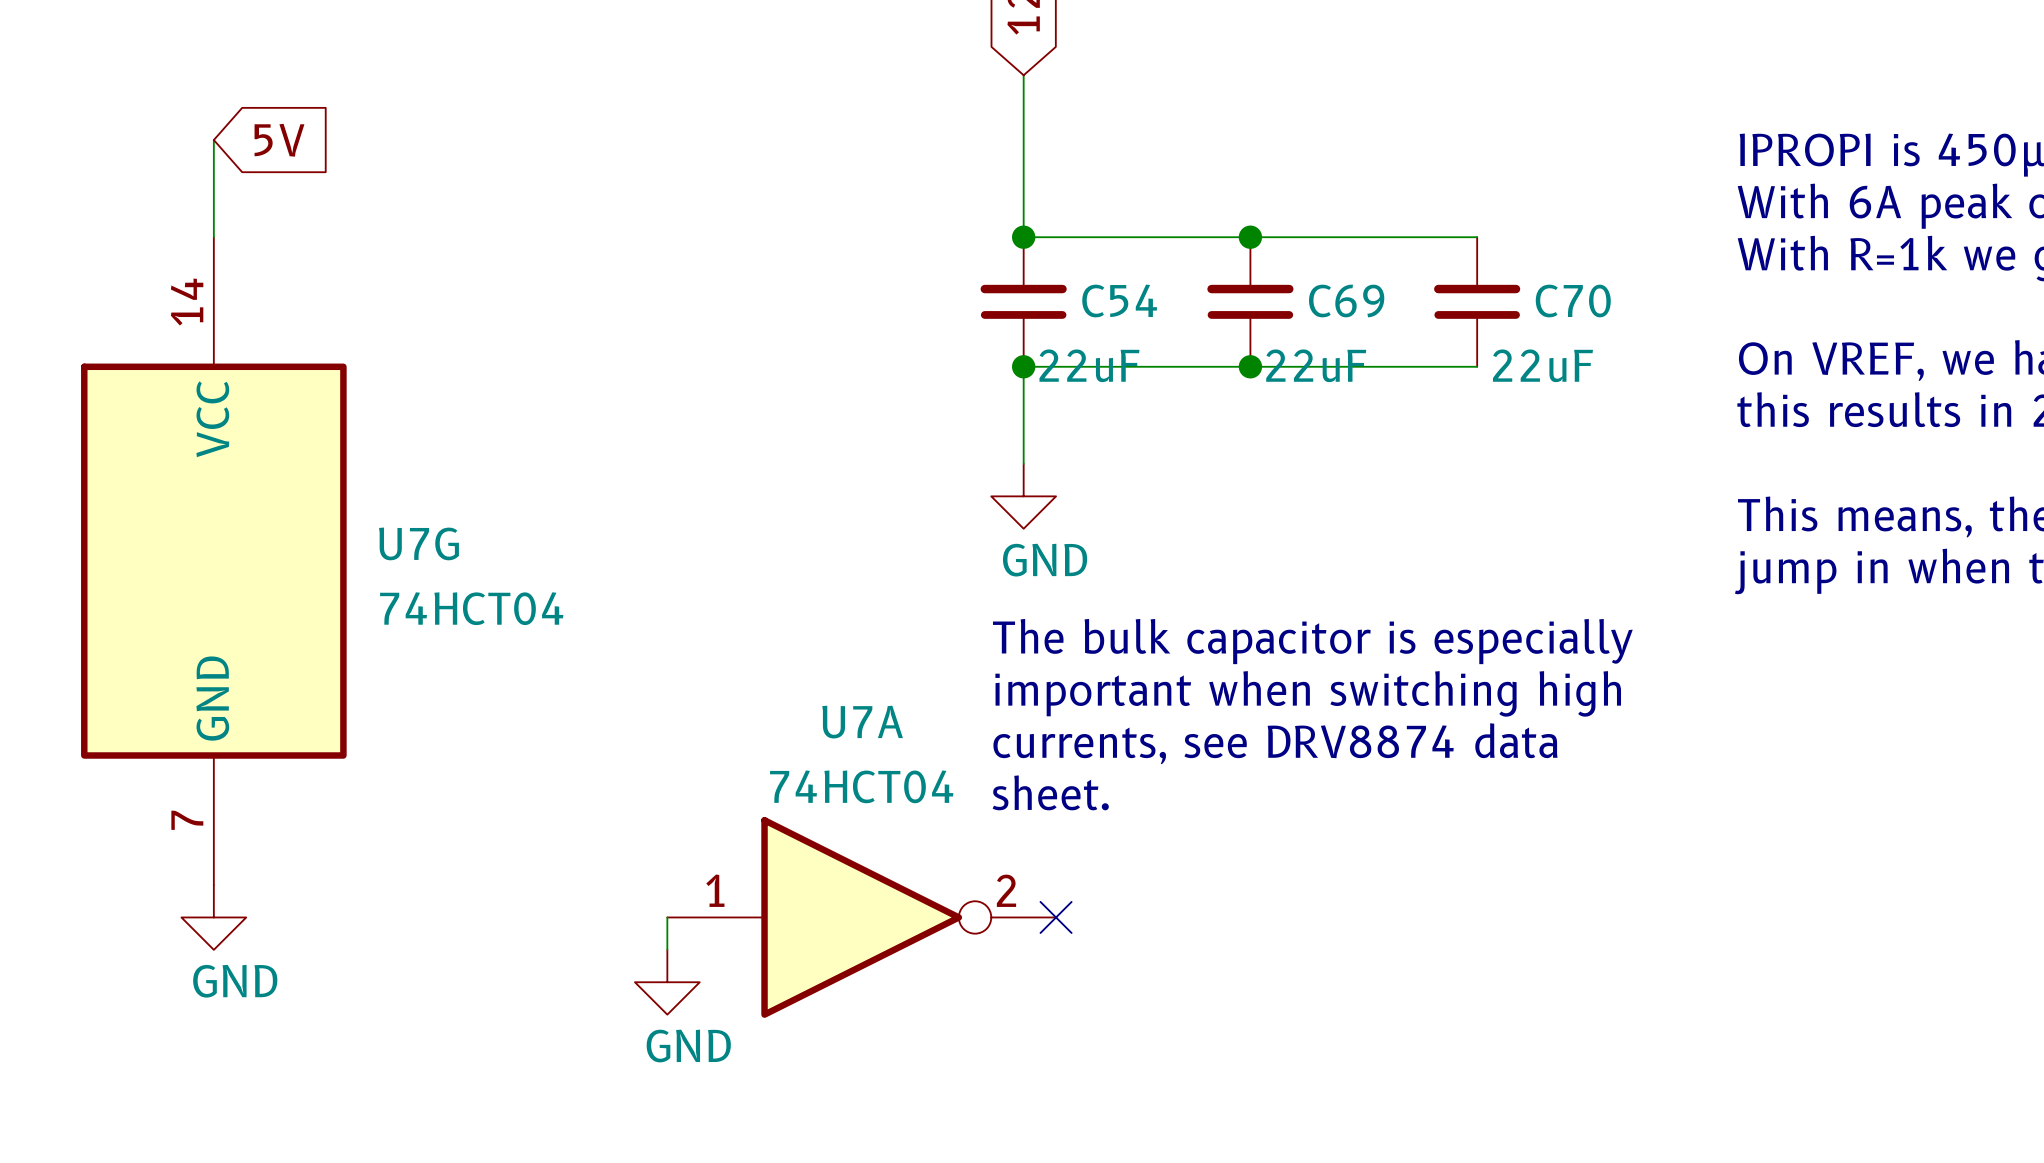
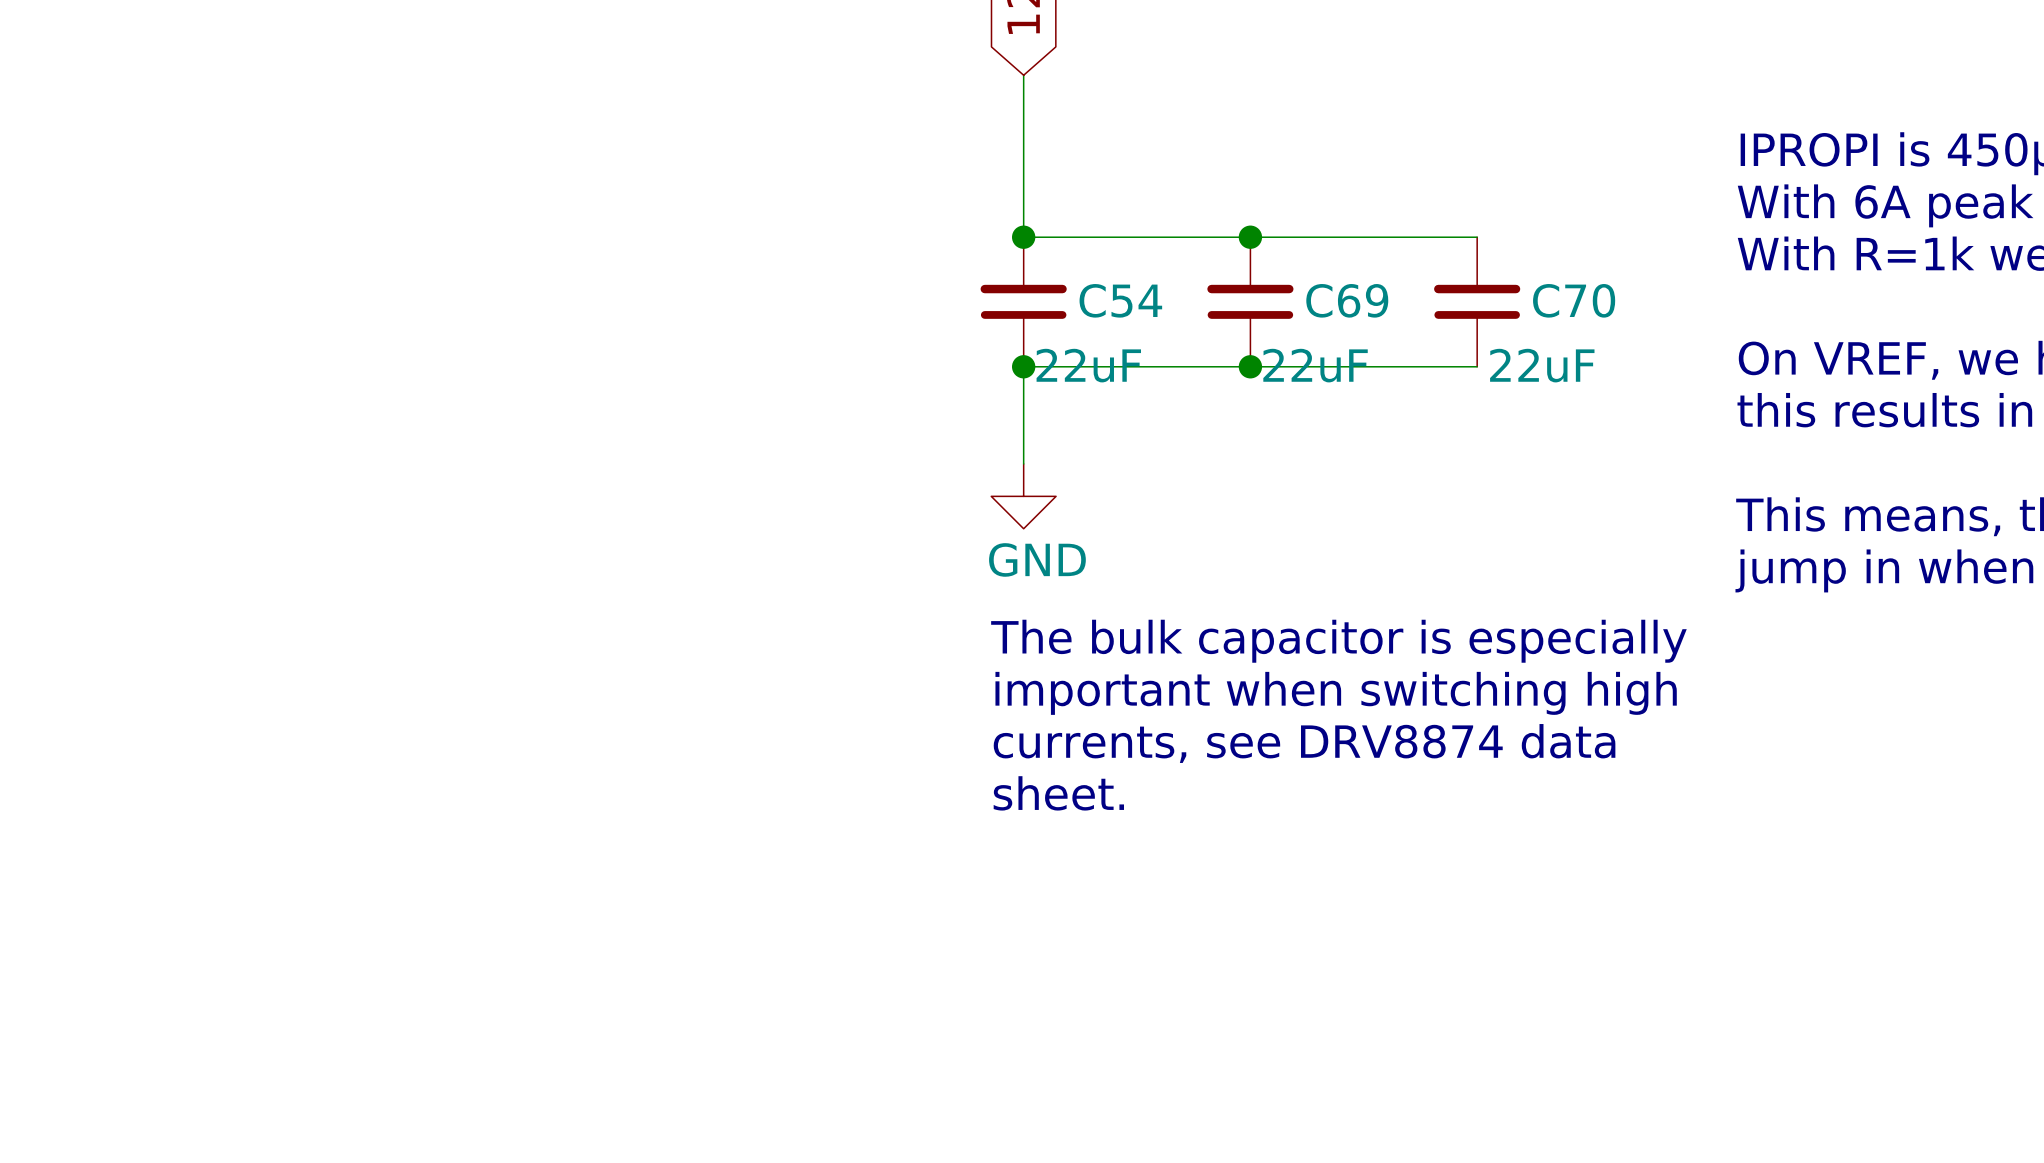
wire: (213, 140) (213, 237) -> none
global label: 5V (279, 140) -> none
U7G: 74HCT04 (213, 561) -> none
power symbol: GND (213, 917) -> none
wire: (667, 917) (667, 949) -> none
U7A: 74HCT04 (861, 917) -> none
no-connect mark: (1056, 917) -> none
power symbol: GND (667, 982) -> none

